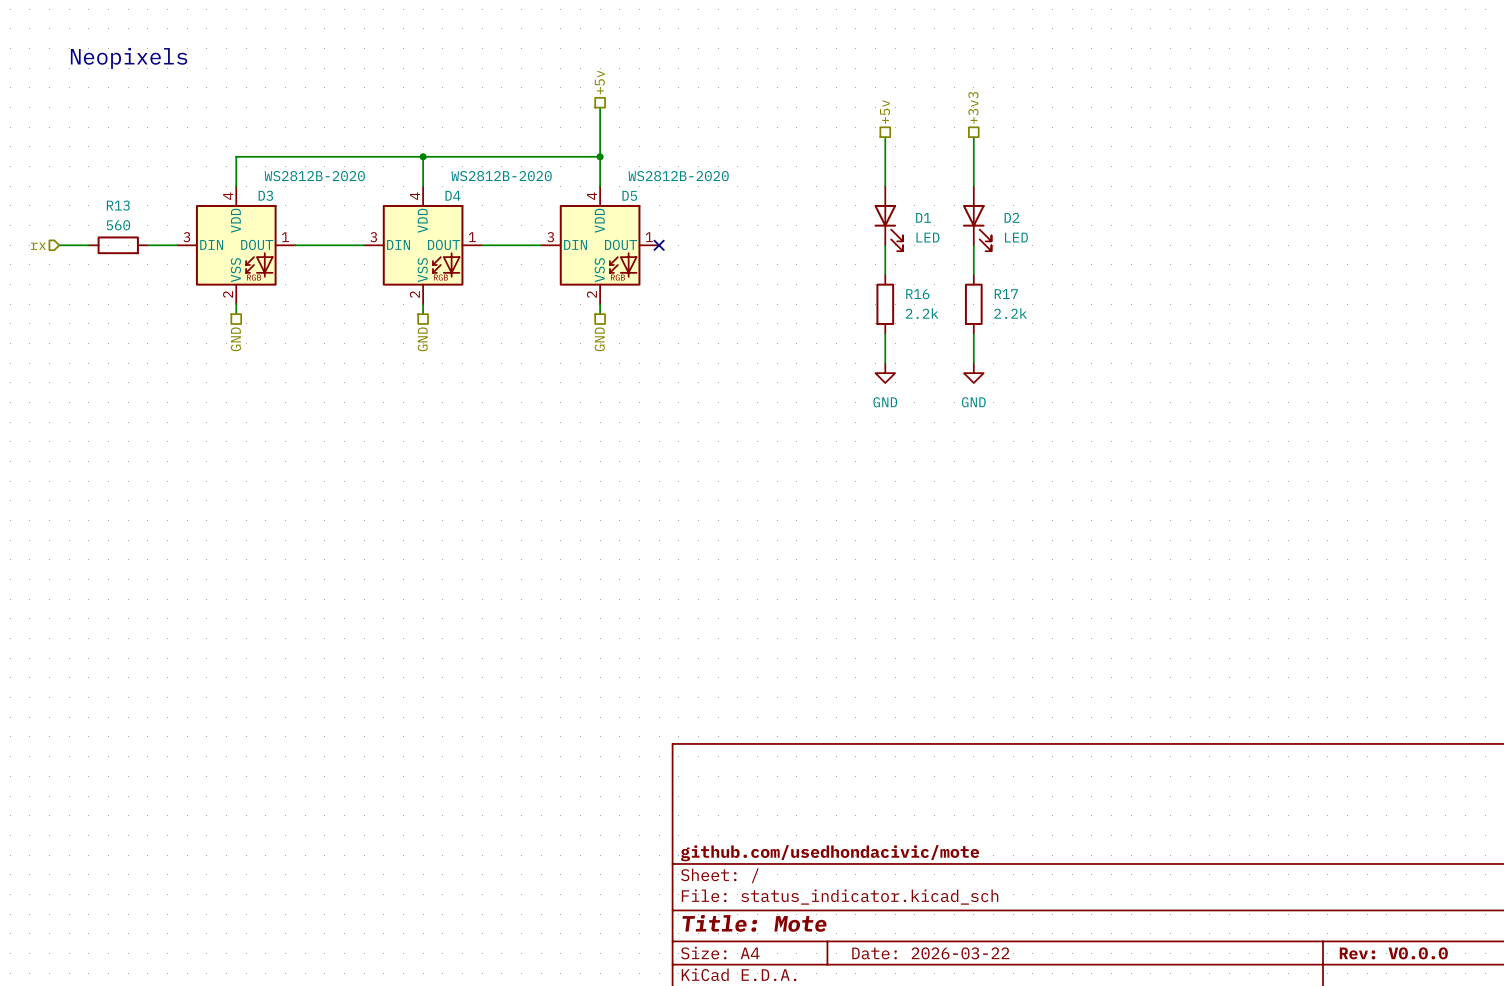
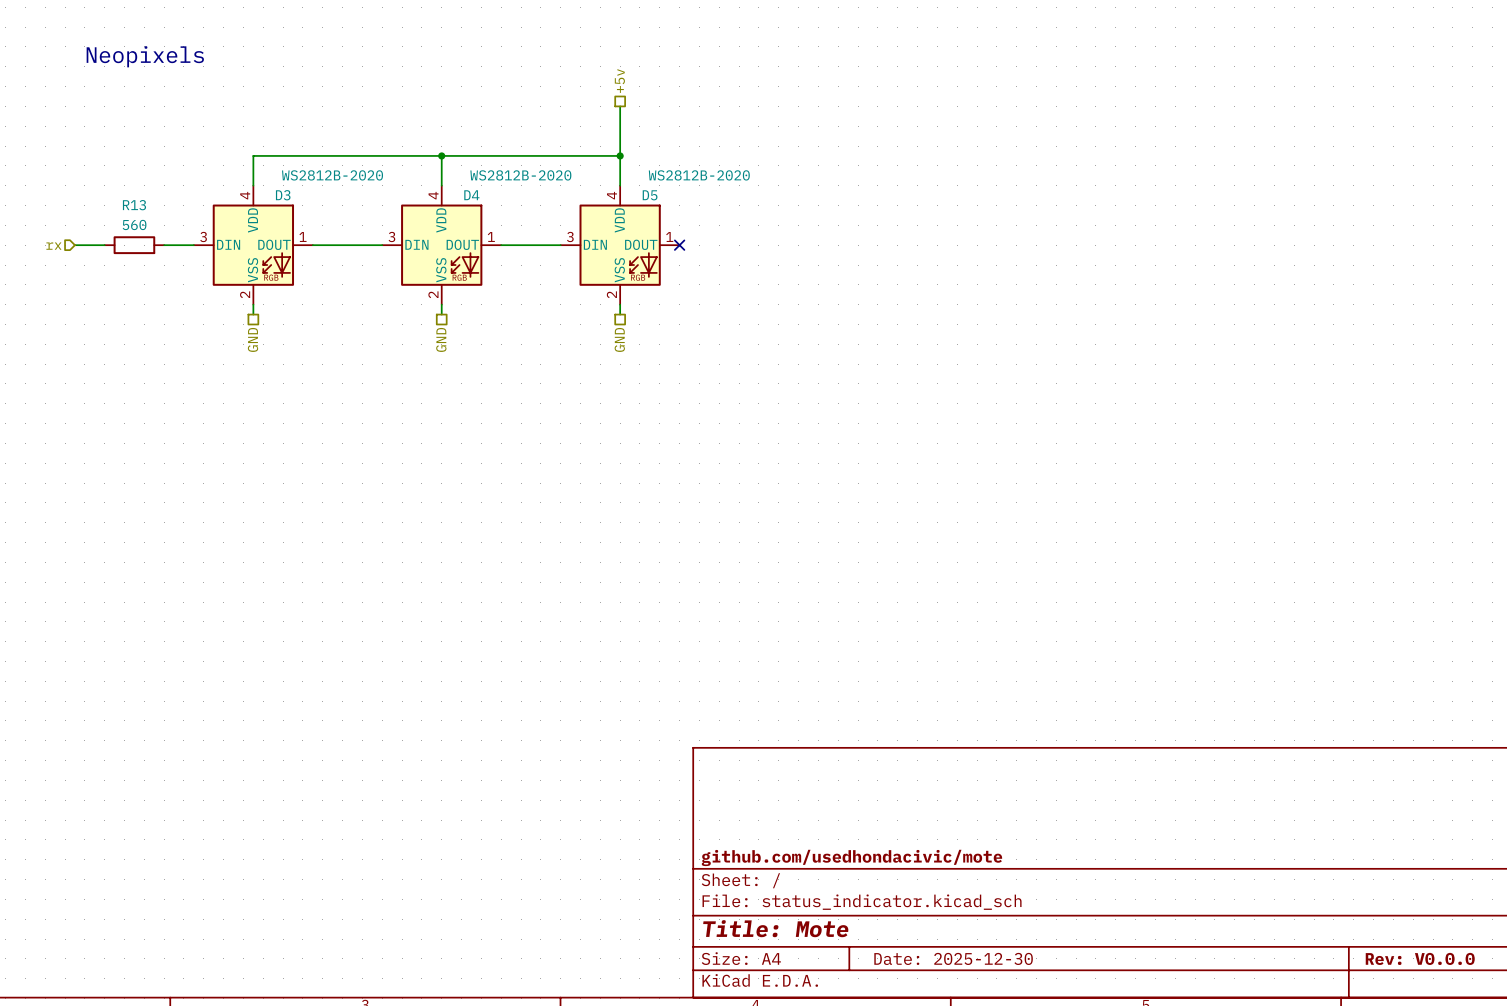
hierarchical label: +3v3 (973, 107) -> none
hierarchical label: +5v (885, 111) -> none
wire: (885, 137) (885, 186) -> none
wire: (973, 137) (973, 186) -> none
D1: LED (888, 218) -> none
D2: LED (977, 218) -> none
wire: (885, 245) (885, 274) -> none
wire: (973, 245) (973, 274) -> none
R16: 2.2k (885, 304) -> none
R17: 2.2k (973, 304) -> none
wire: (885, 333) (885, 363) -> none
wire: (973, 333) (973, 363) -> none
power symbol: GND (885, 373) -> none
power symbol: GND (973, 373) -> none
title block: Date: 2026-03-22 (930, 953) -> Date: 2025-12-30 (953, 958)

